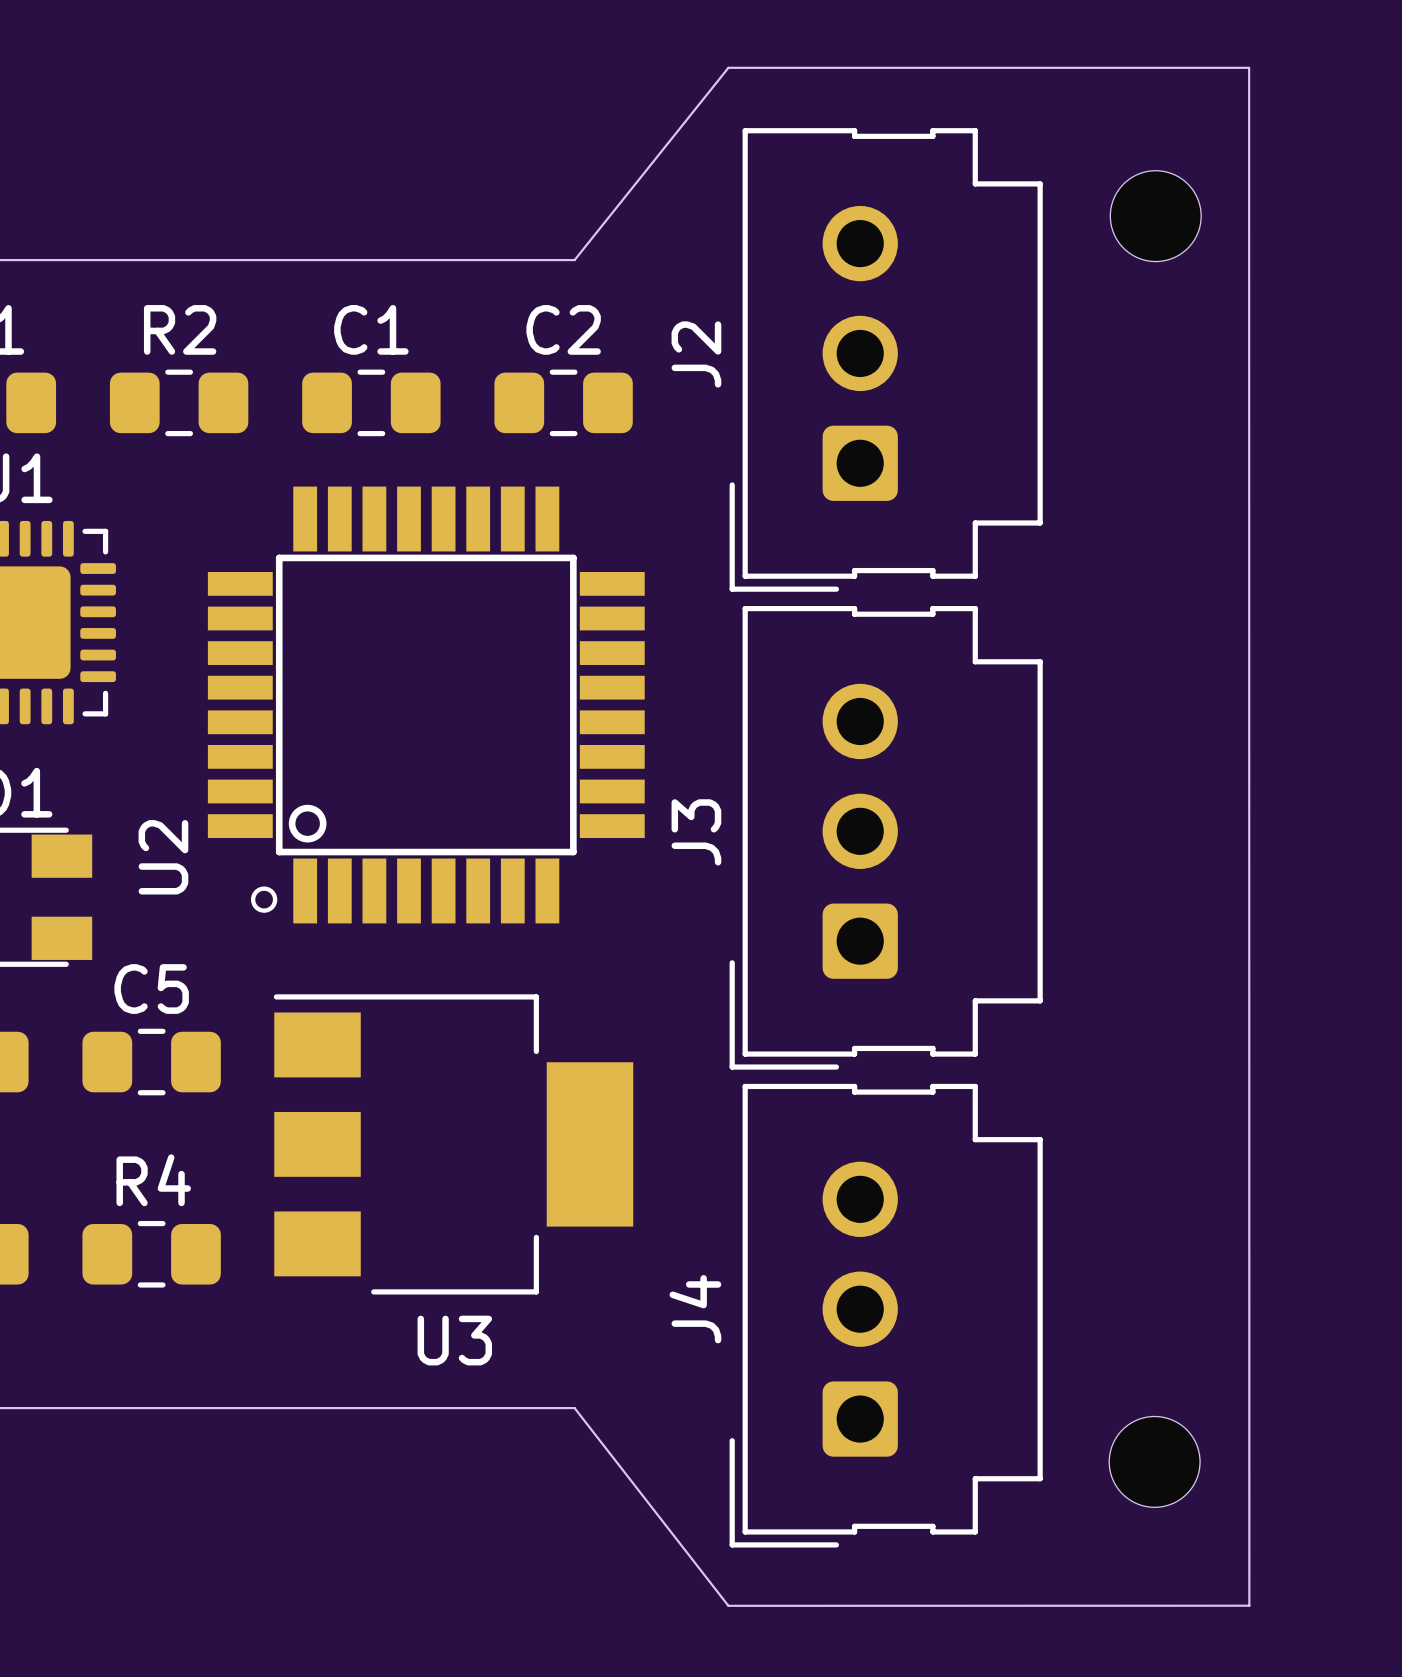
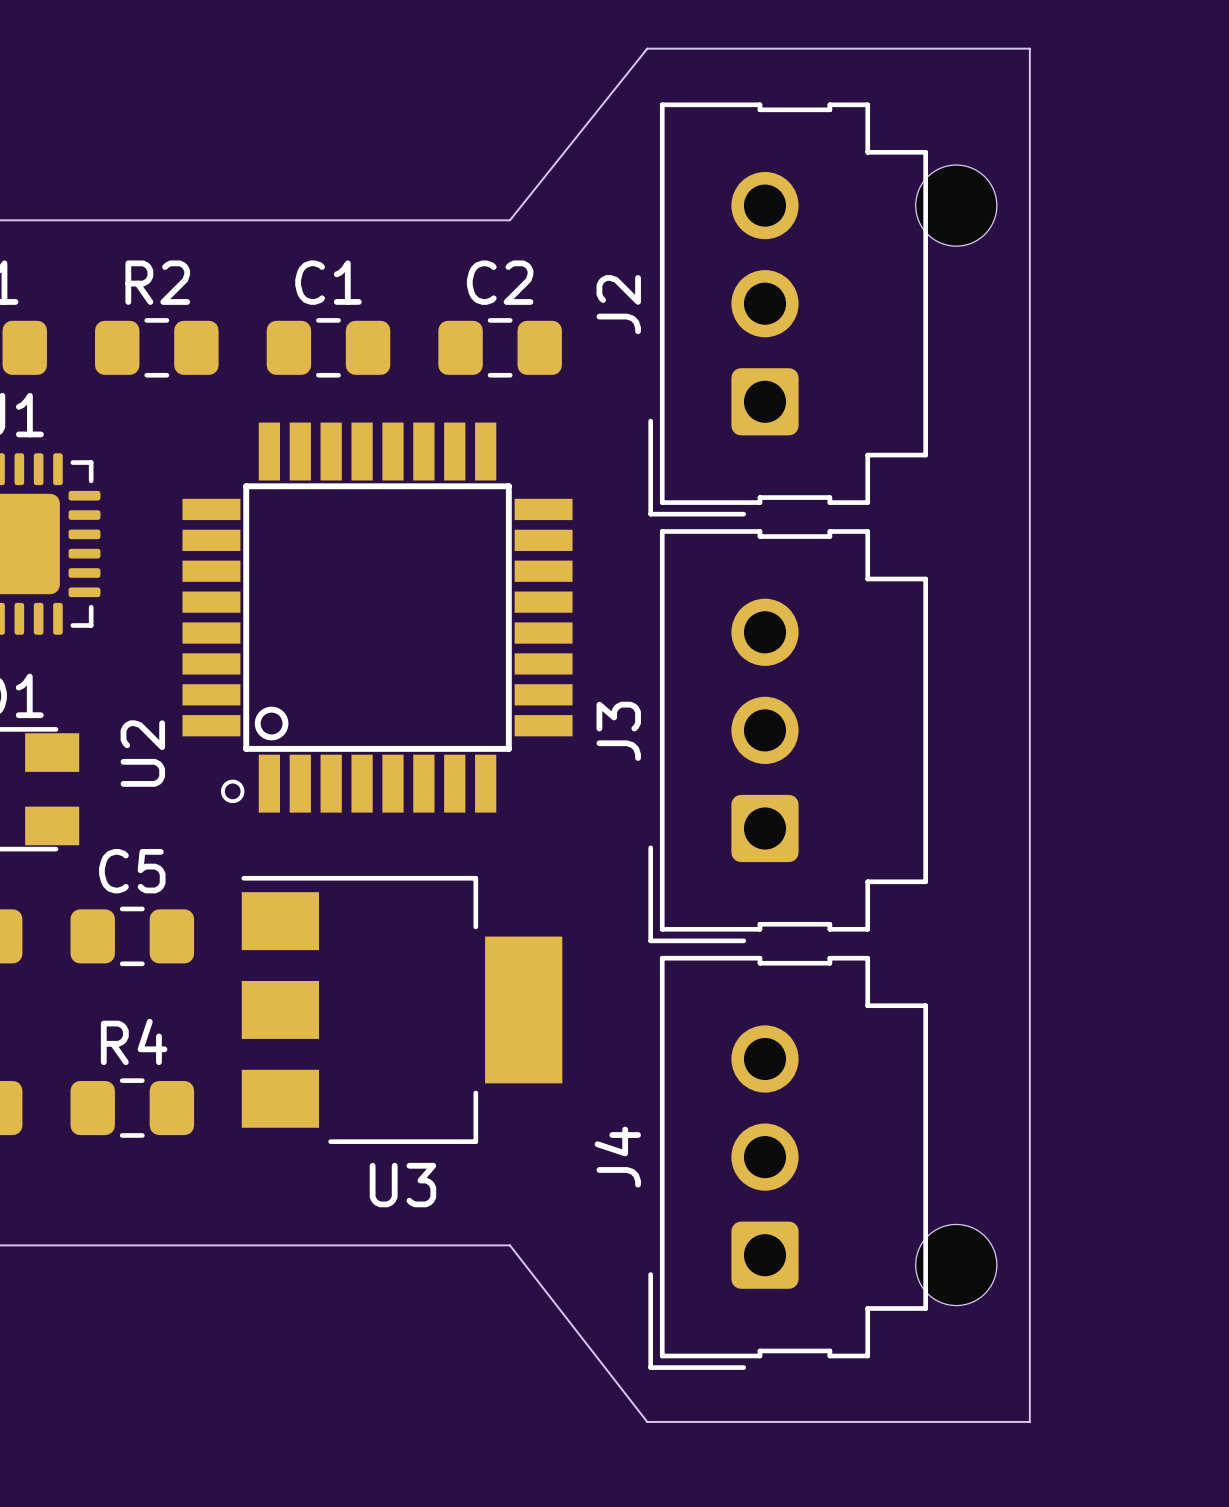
board edge: (1156, 67) (1249, 67) (1249, 1605) (728, 1605) -> (1029, 48) (1029, 1421) (647, 1421)
part position: (1155, 216) -> (956, 205)
part position: (1154, 1461) -> (956, 1265)

